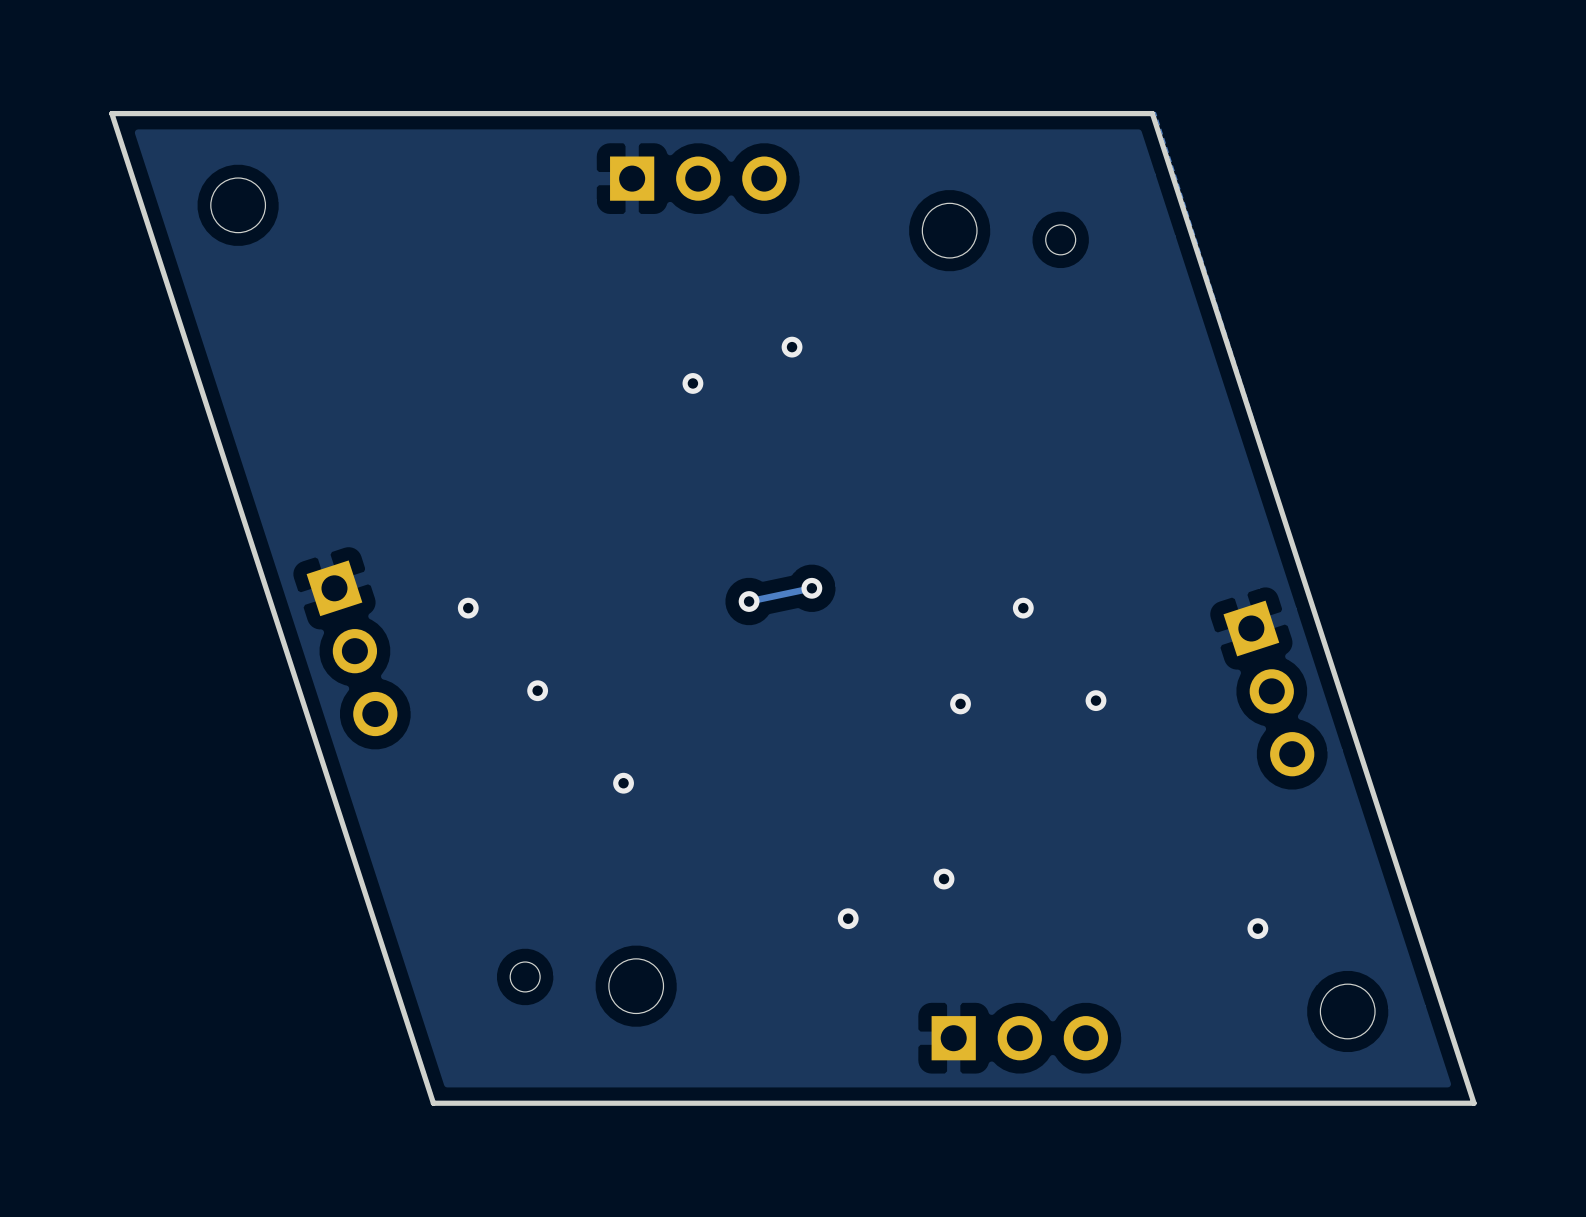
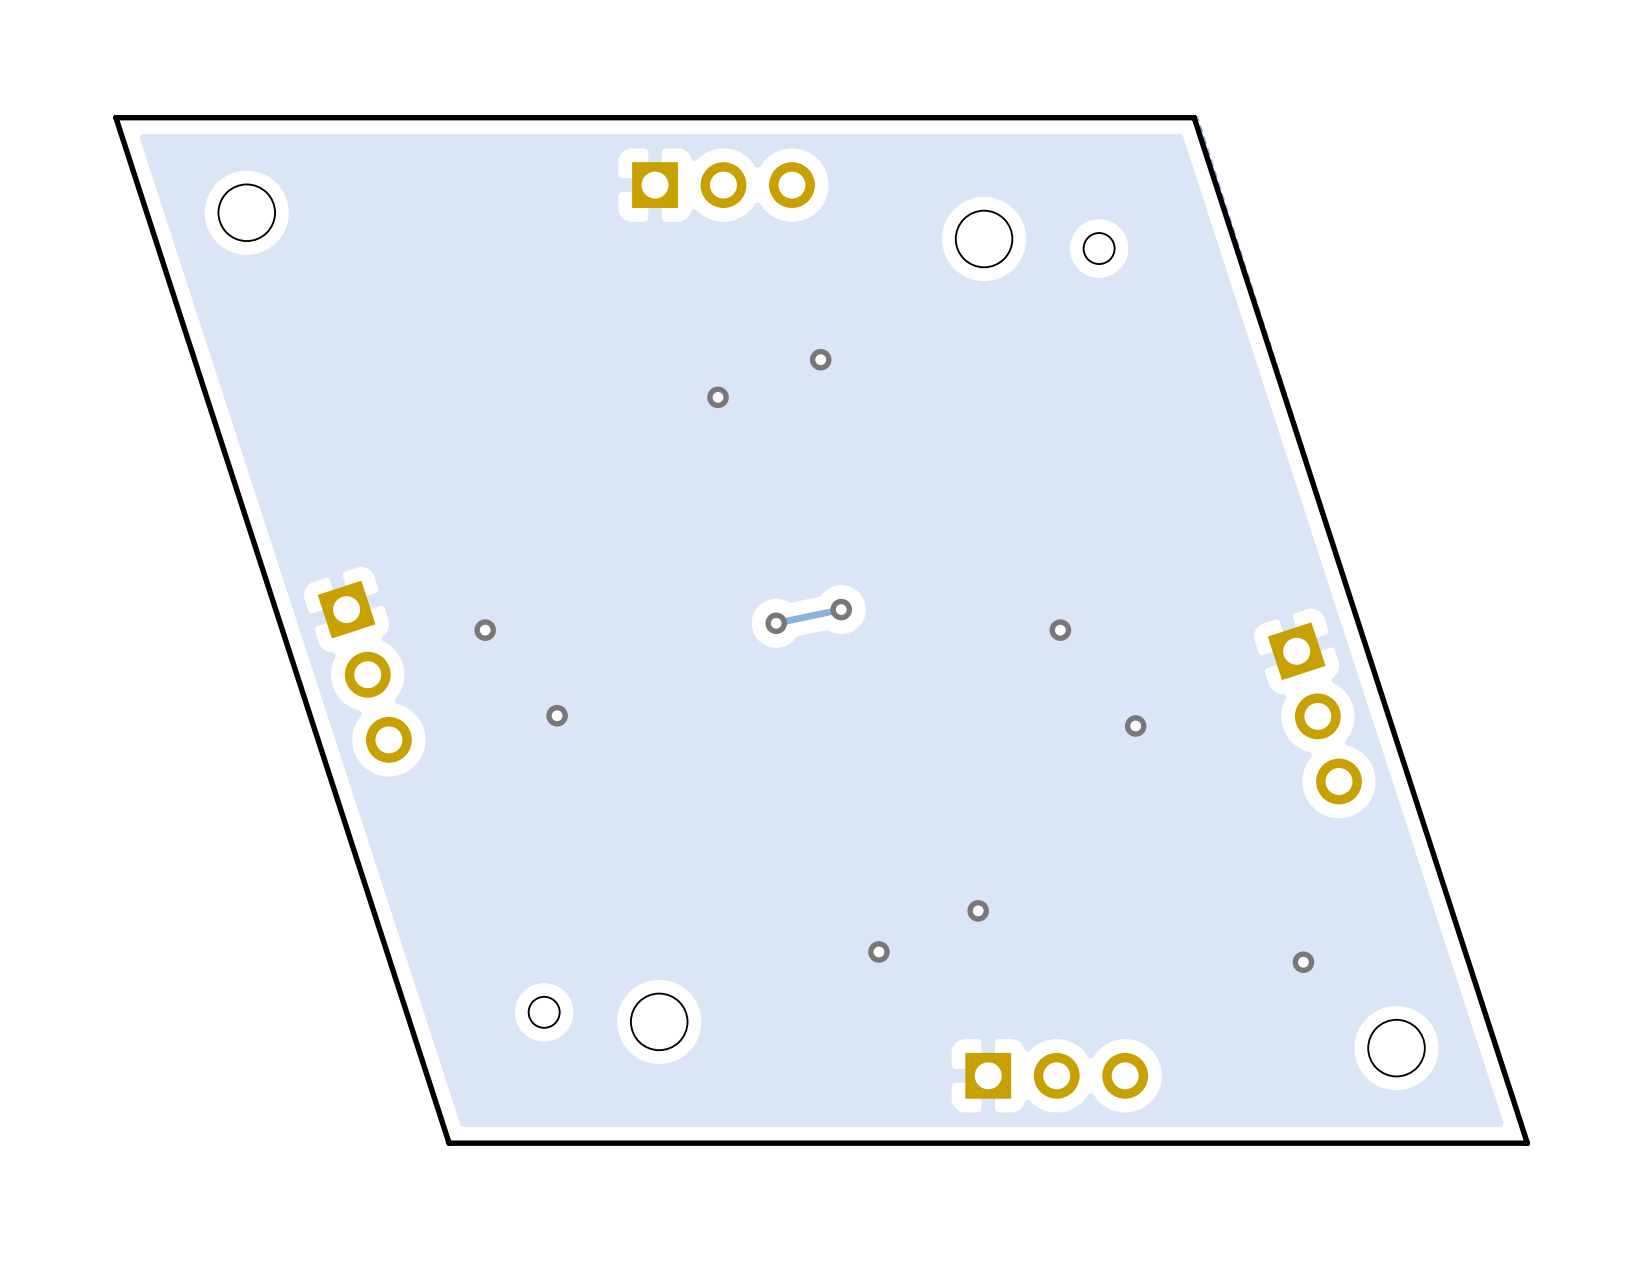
via: (960, 703) -> none
via: (623, 783) -> none

